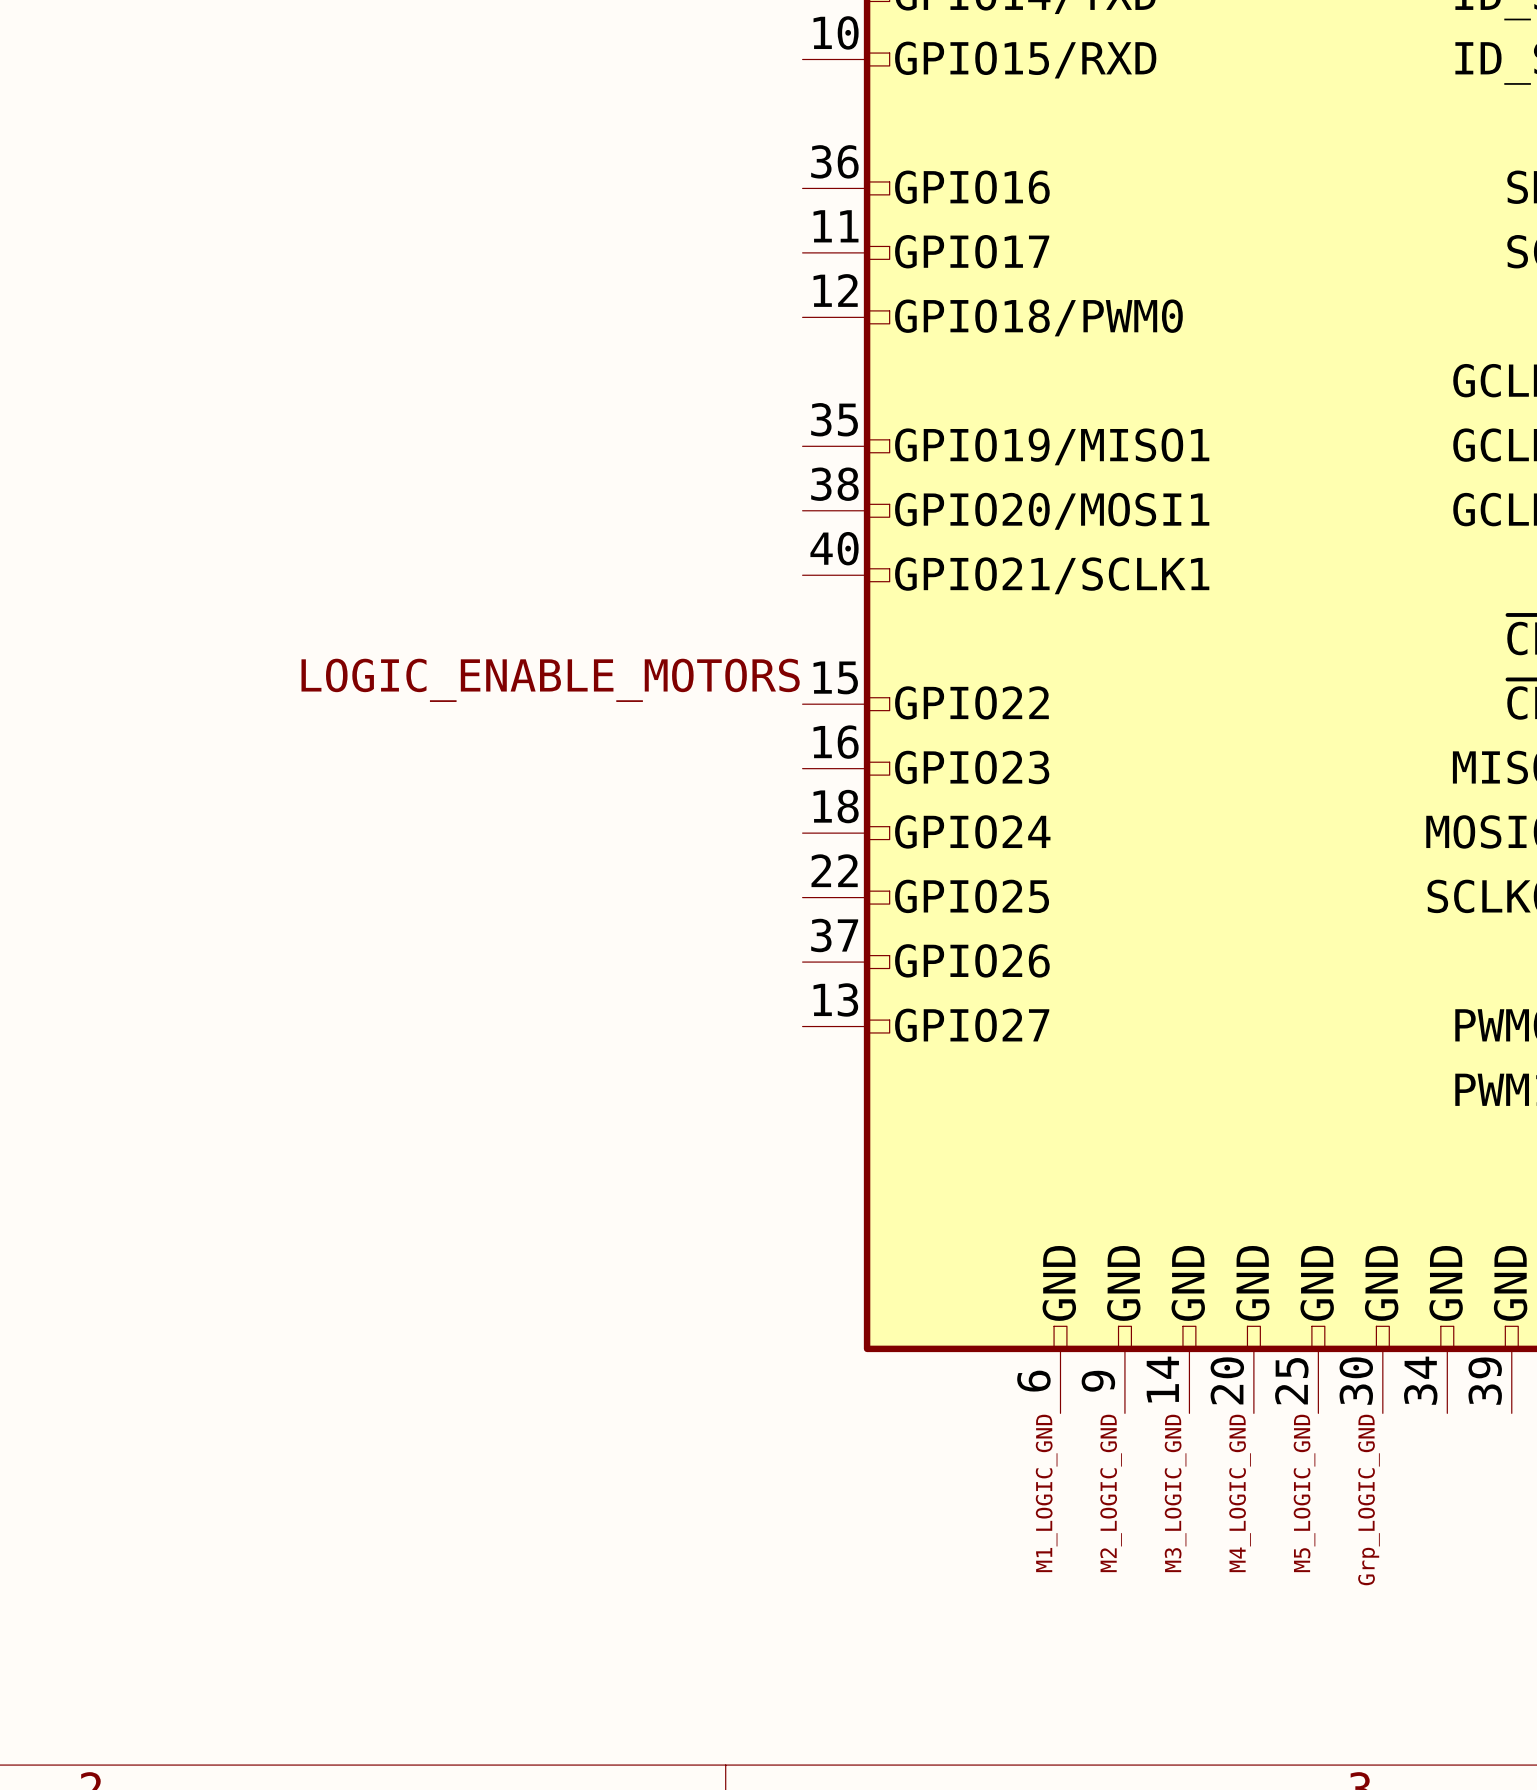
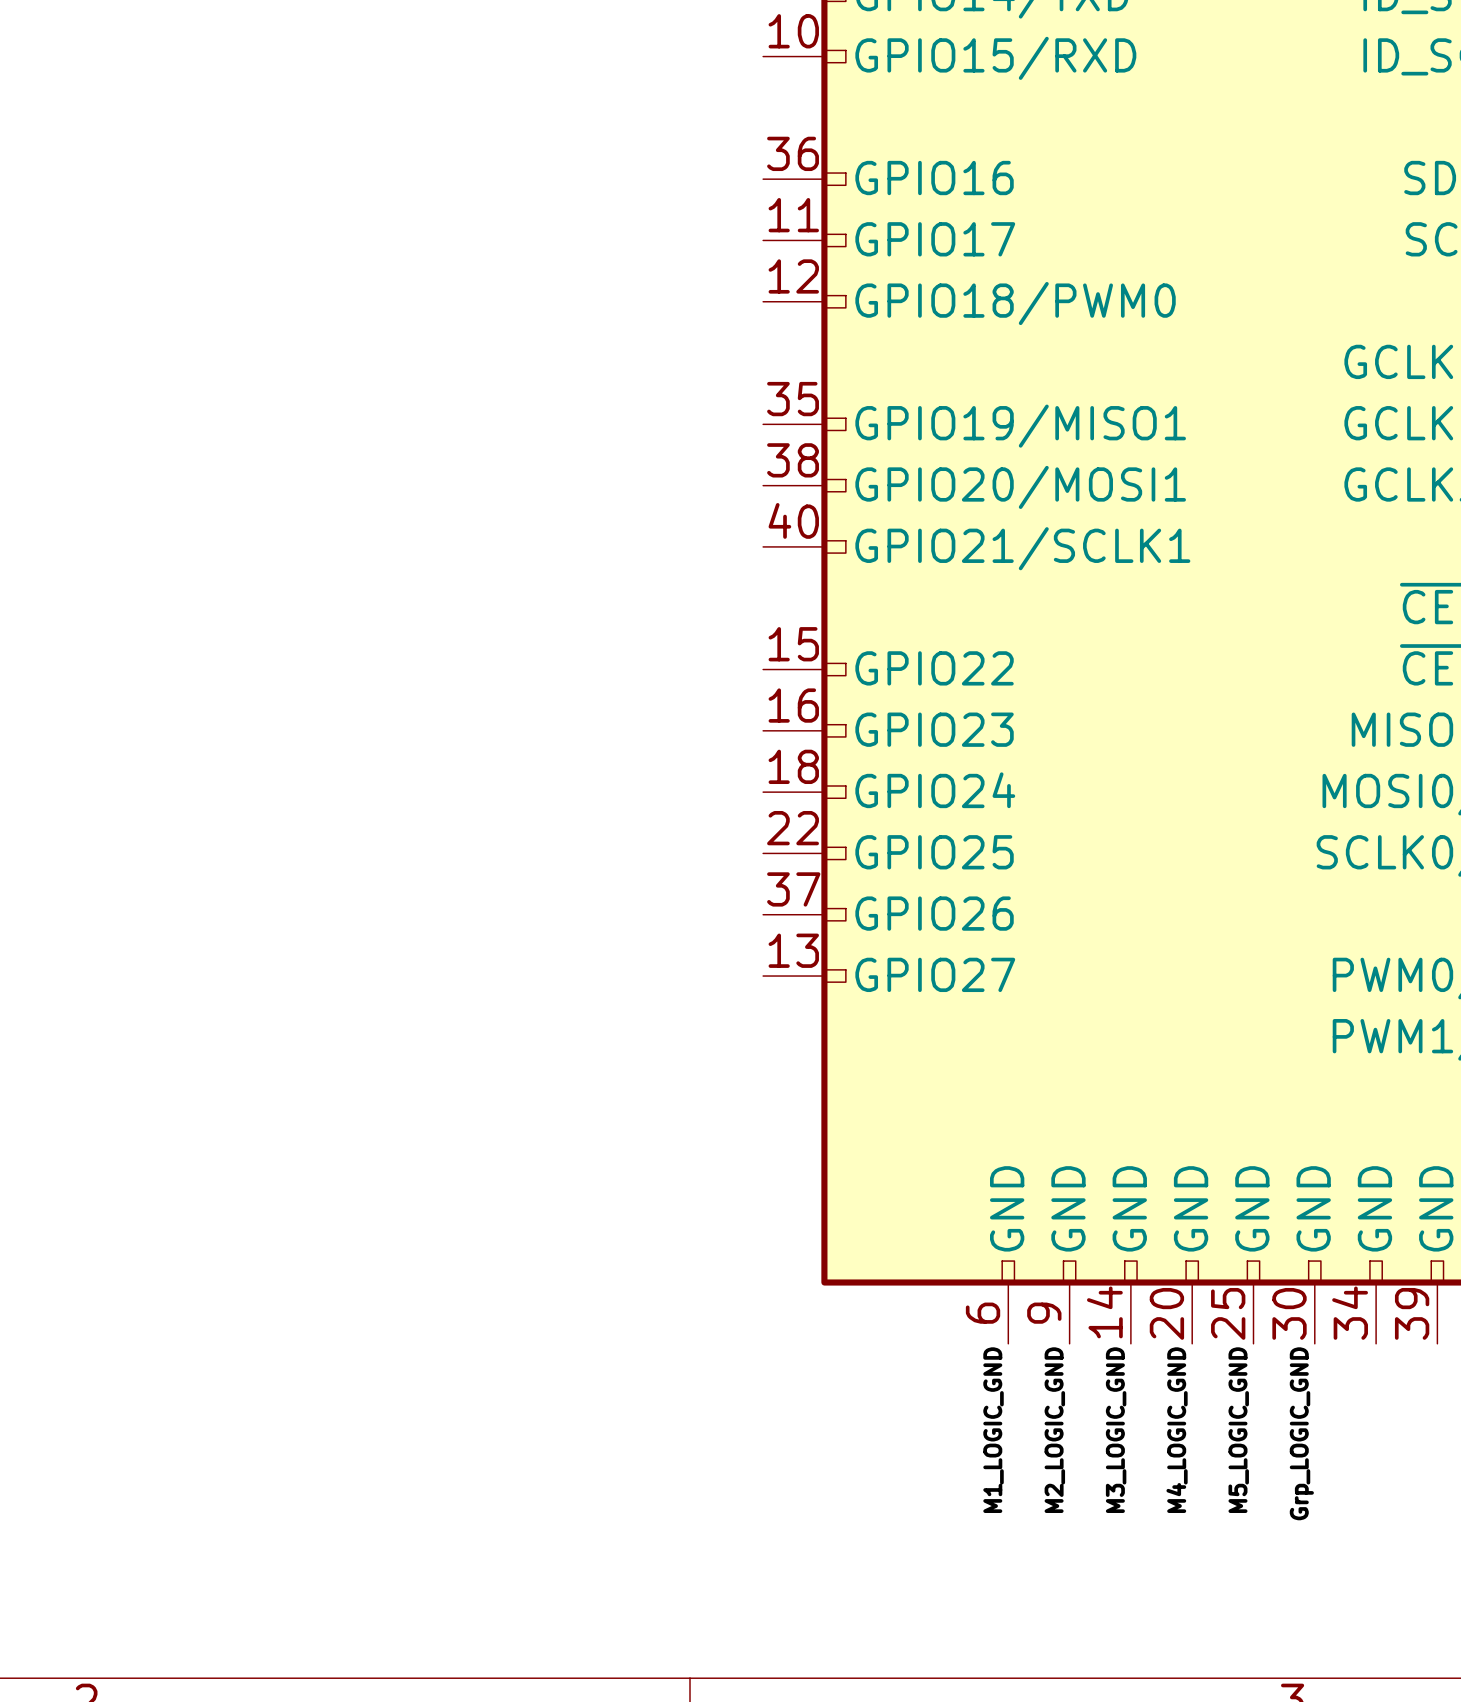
label: LOGIC_ENABLE_MOTORS (550, 680) -> none

